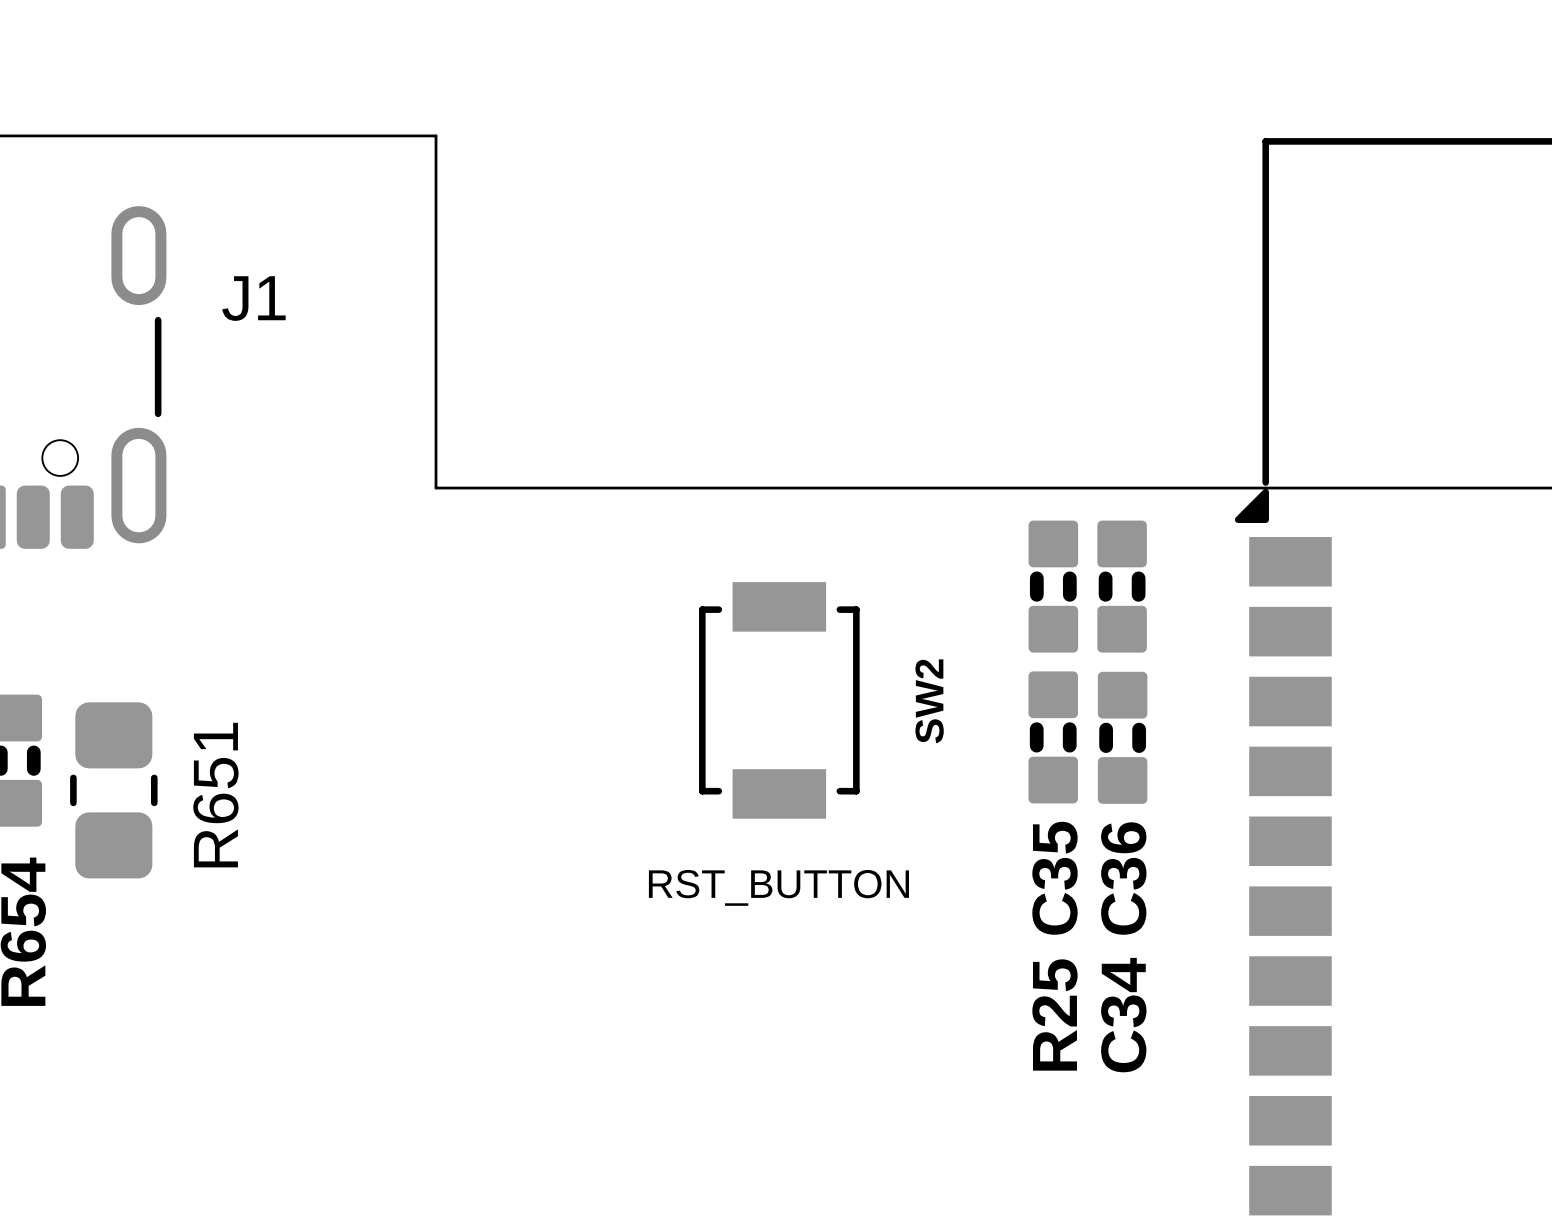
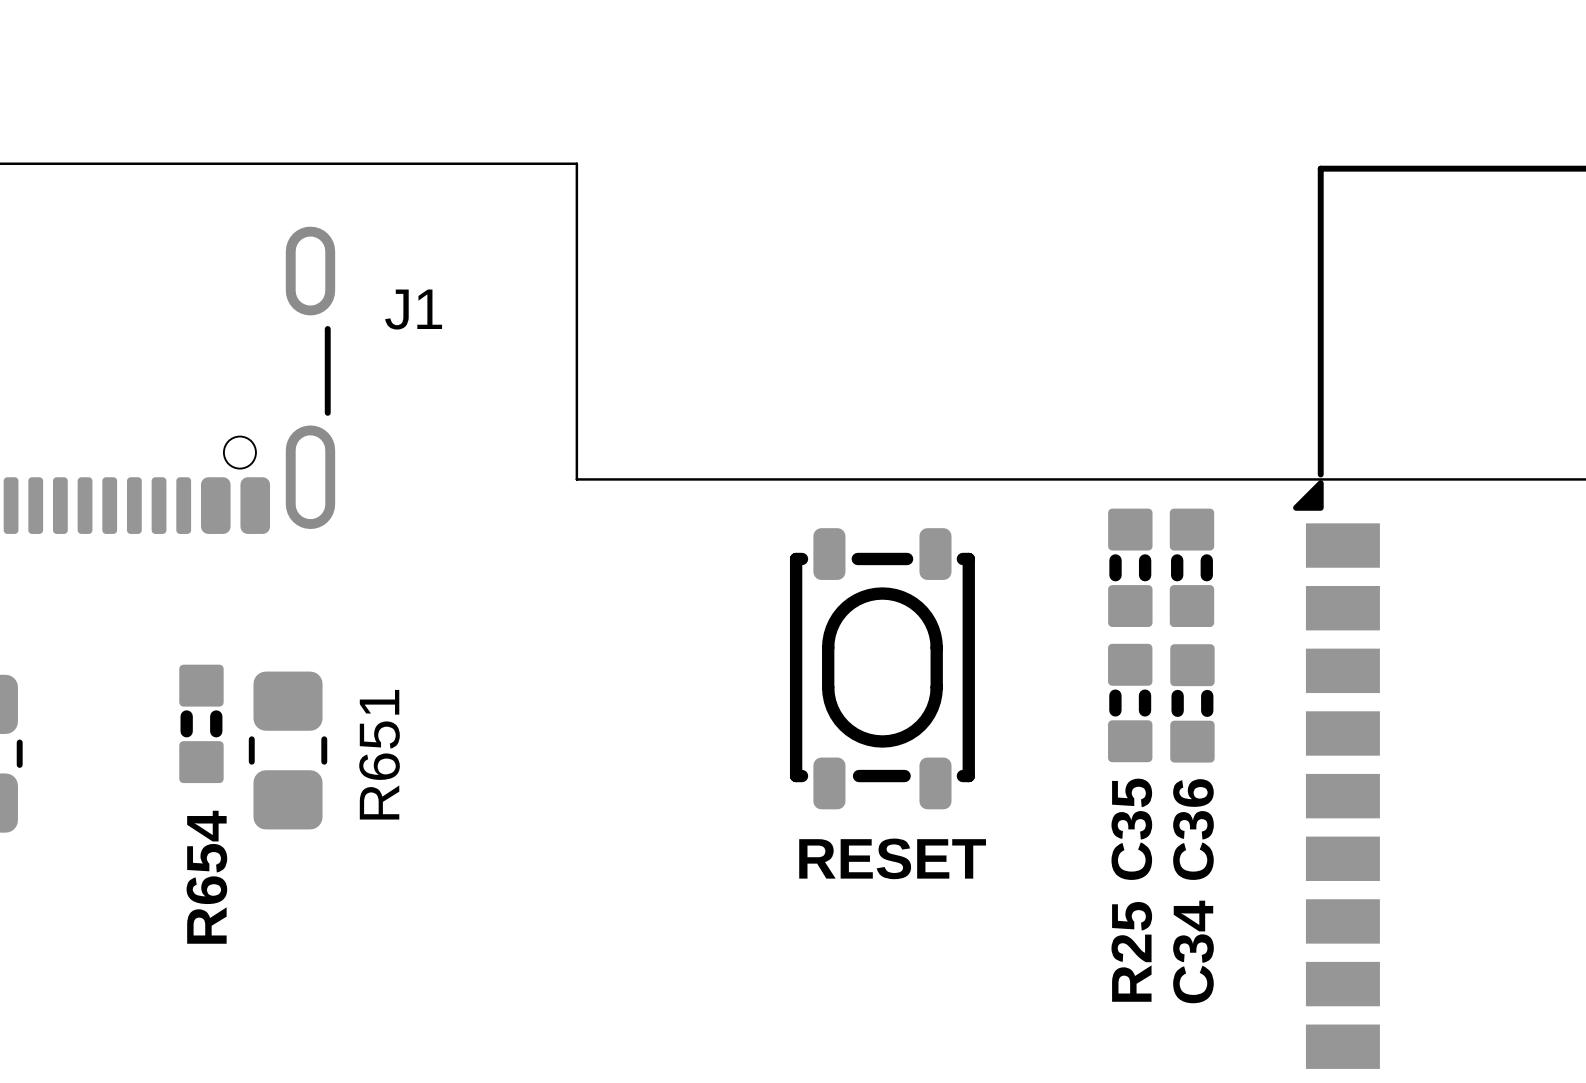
part: none -> (882, 668)
SW2: (779, 700) -> none
text: RST_BUTTON (778, 887) -> RESET (892, 858)

